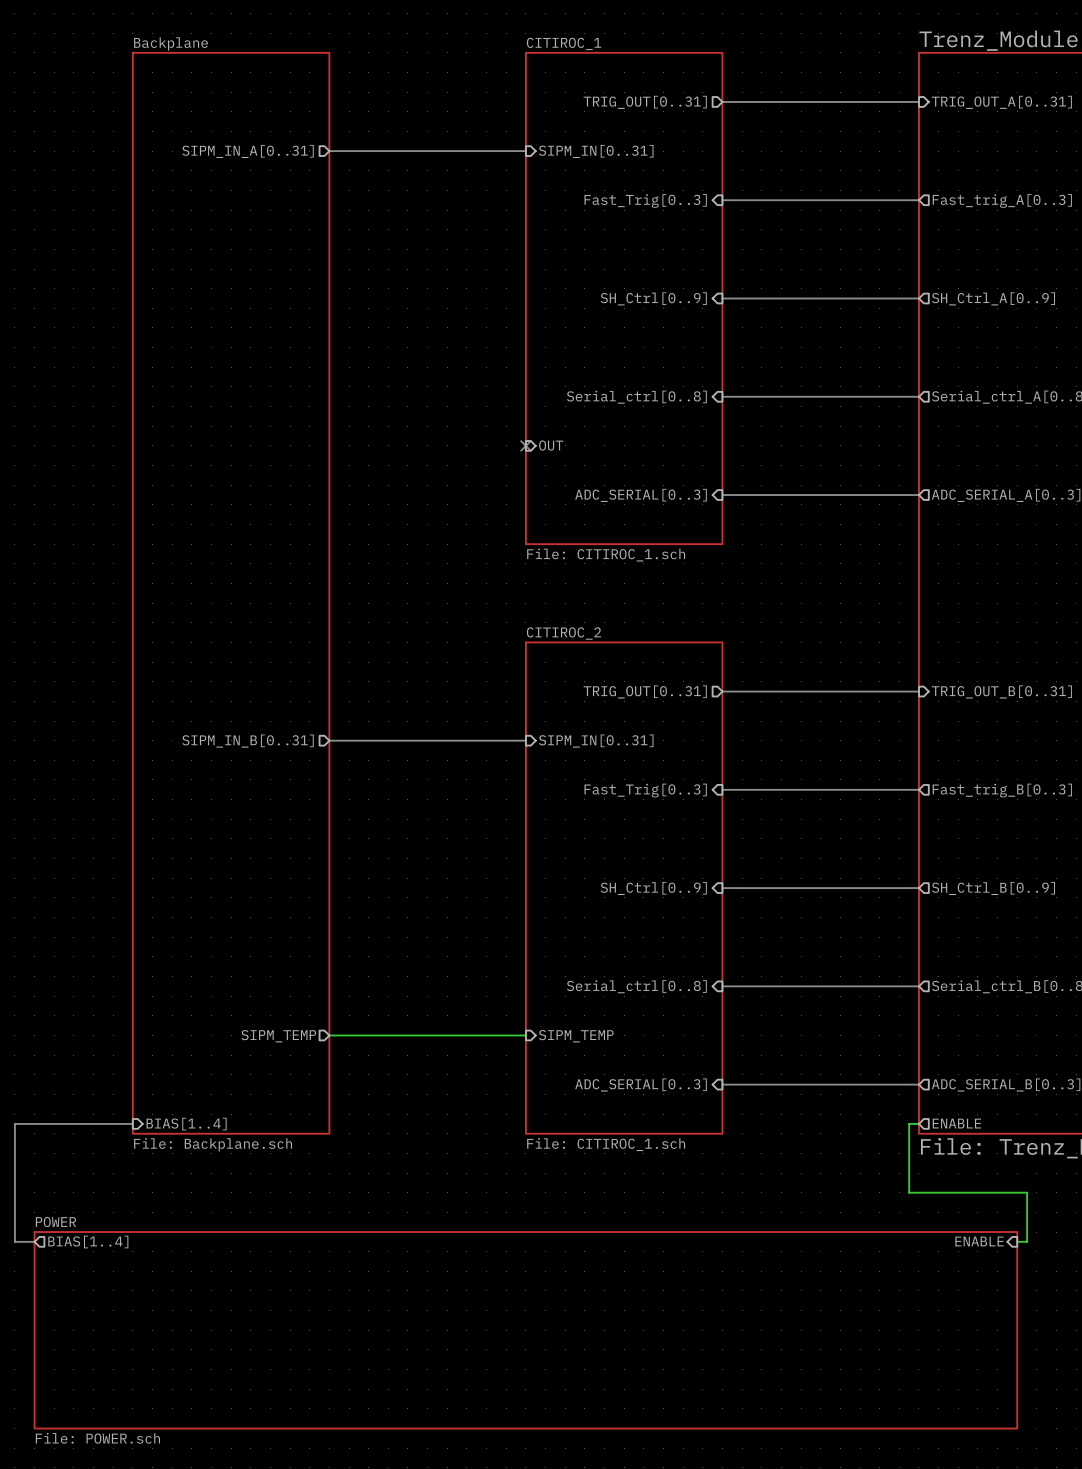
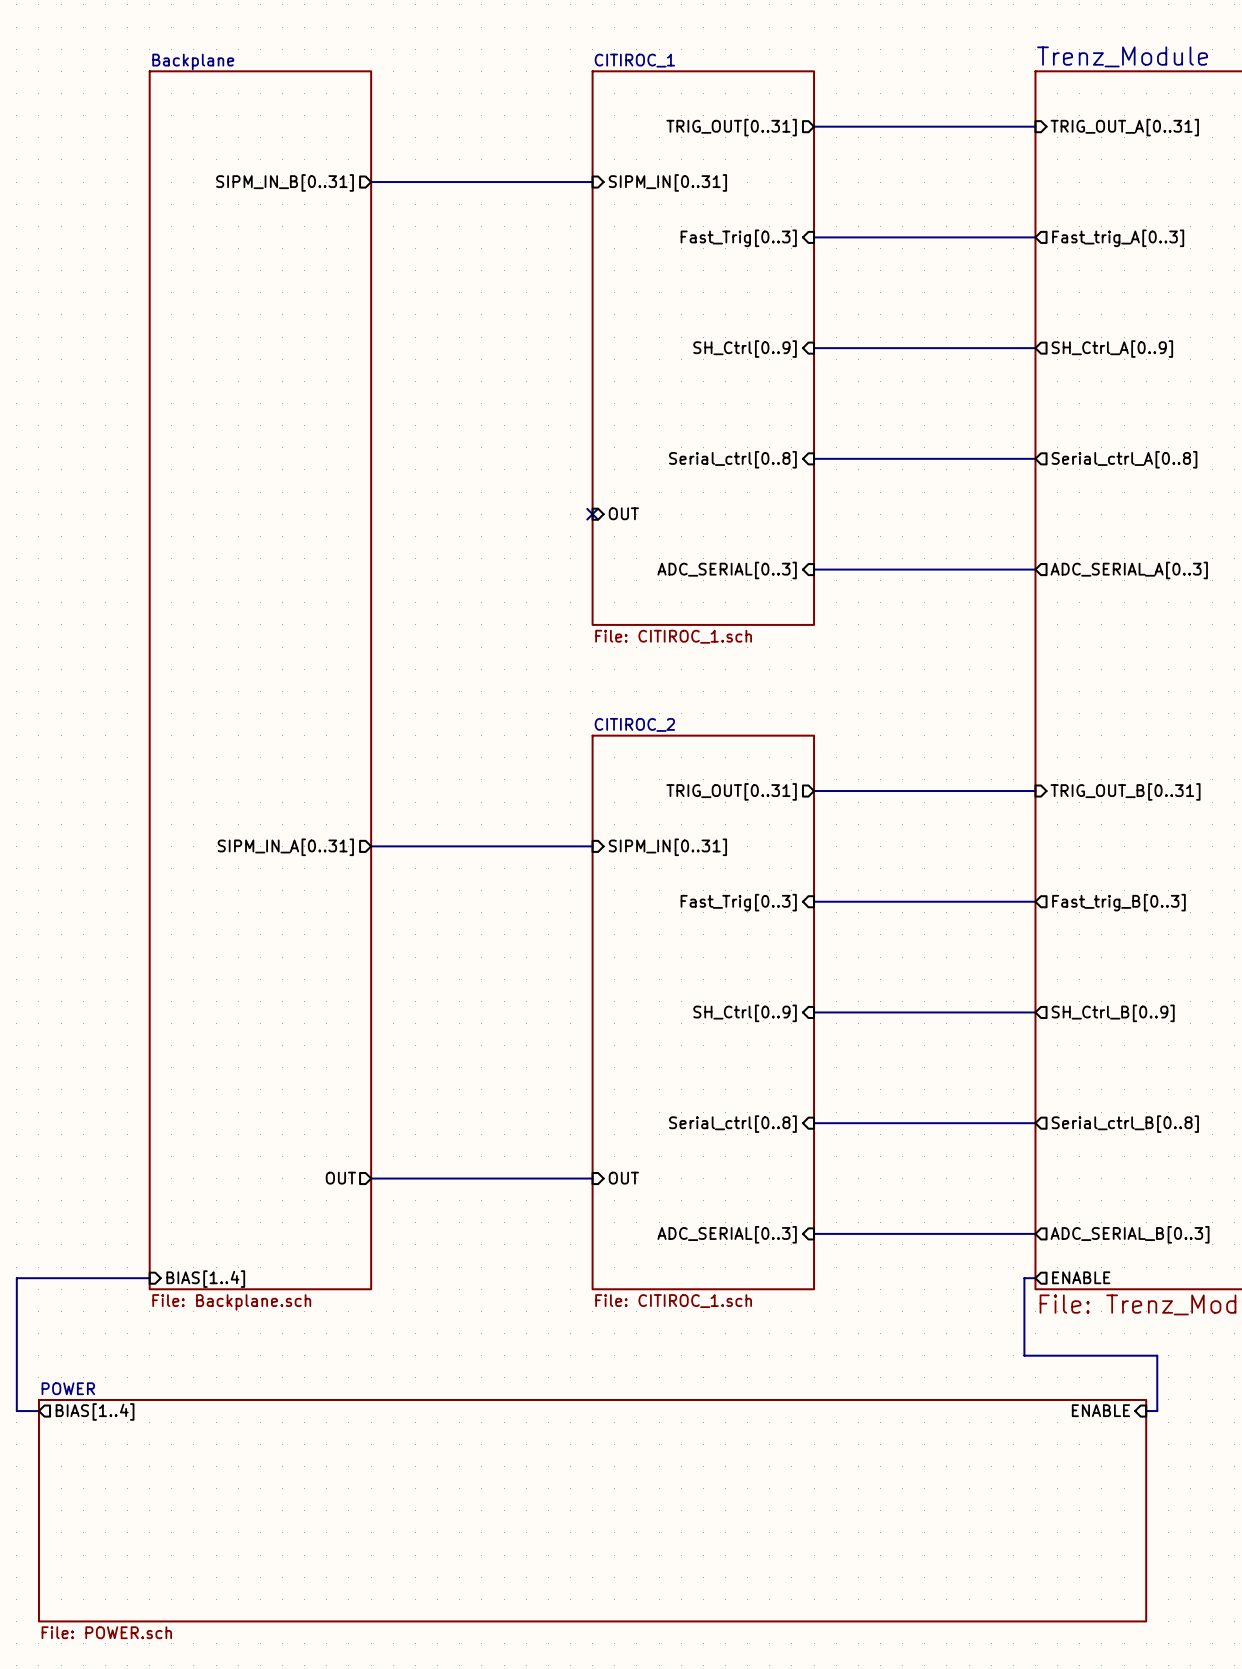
sheet pin: SIPM_IN_A[0..31] (248, 151) -> SIPM_IN_B[0..31] (285, 182)
sheet pin: SIPM_IN_B[0..31] (248, 741) -> SIPM_IN_A[0..31] (285, 847)
sheet pin: SIPM_TEMP (278, 1036) -> OUT (340, 1178)
sheet pin: SIPM_TEMP (576, 1036) -> OUT (623, 1178)

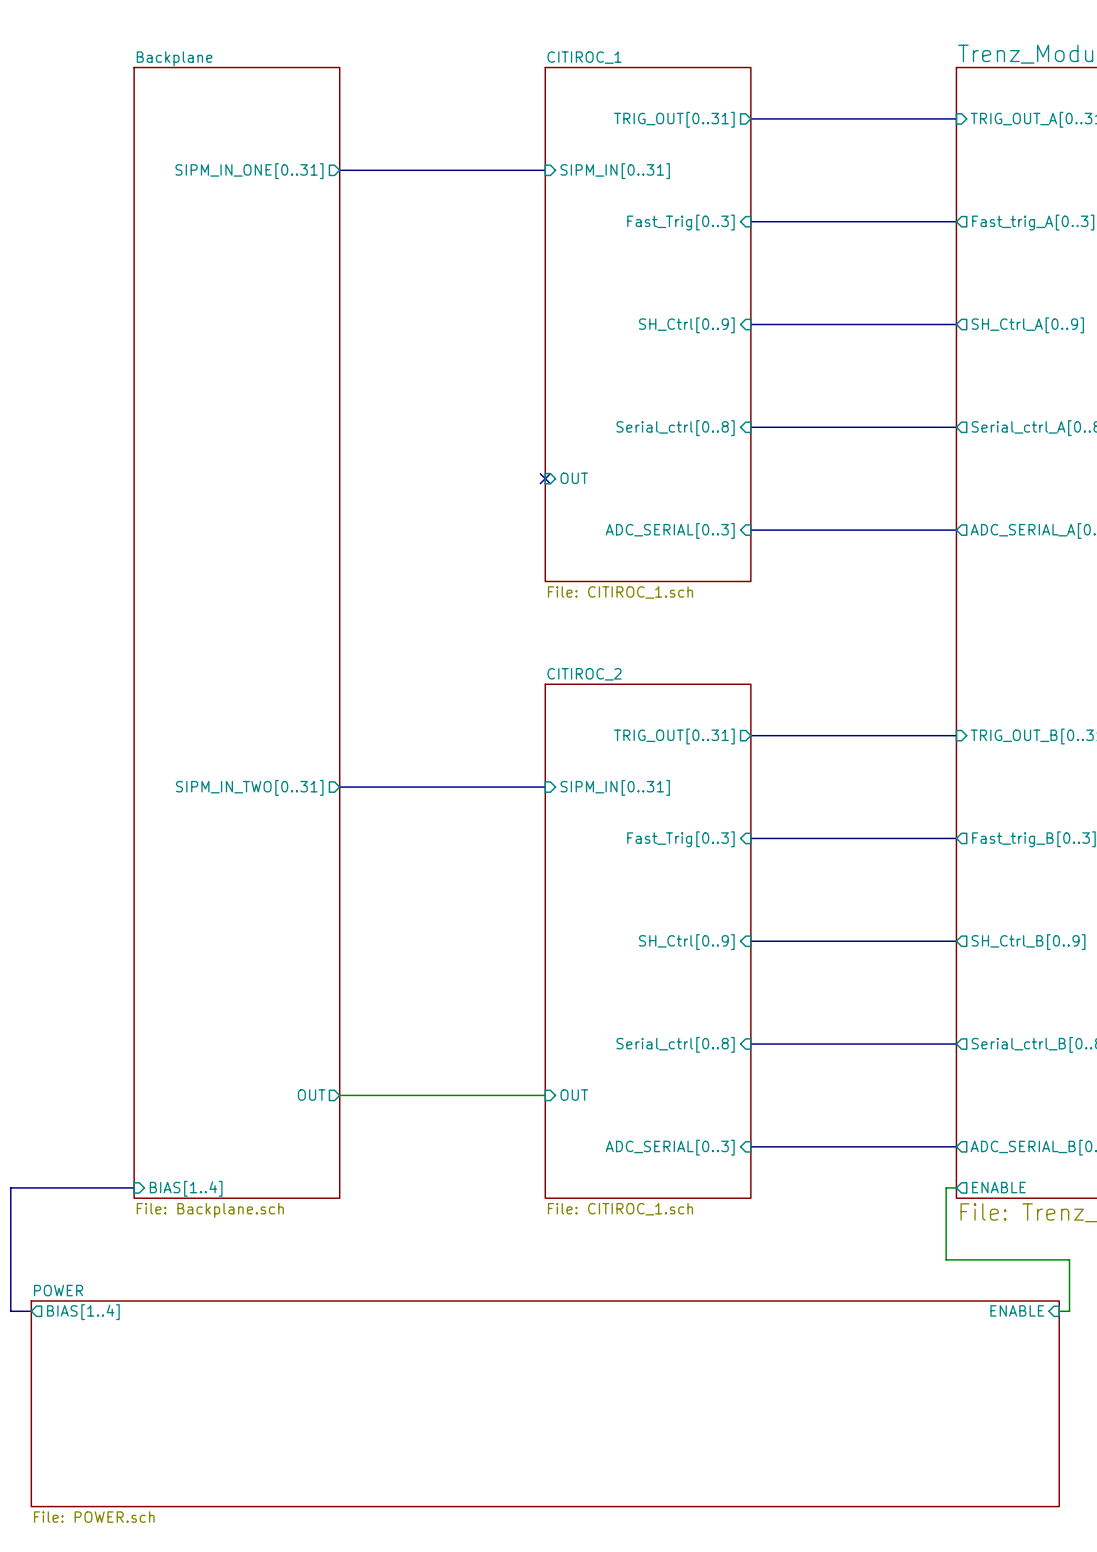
sheet pin: SIPM_IN_B[0..31] (285, 182) -> SIPM_IN_ONE[0..31] (249, 171)
sheet pin: SIPM_IN_A[0..31] (285, 847) -> SIPM_IN_TWO[0..31] (249, 787)

